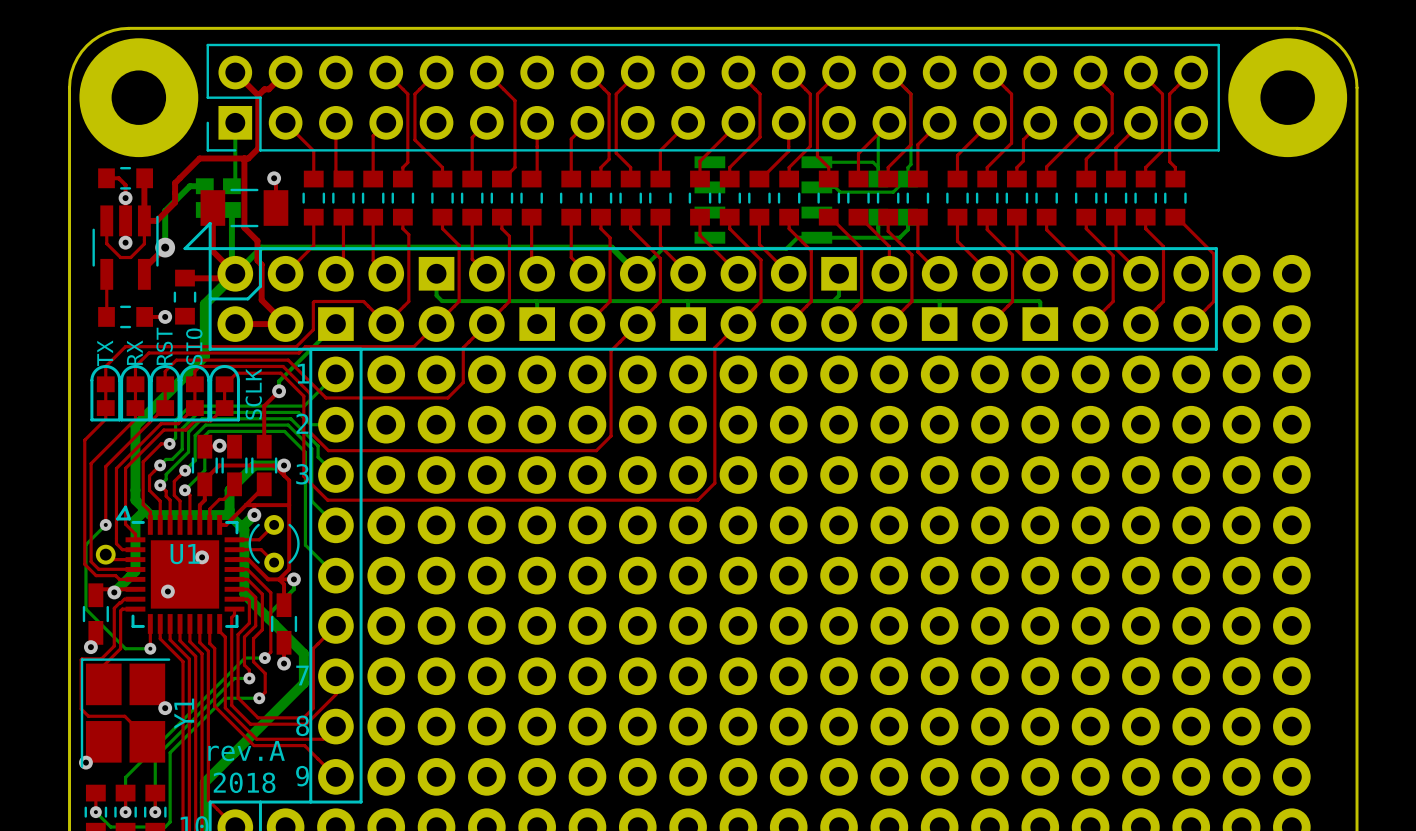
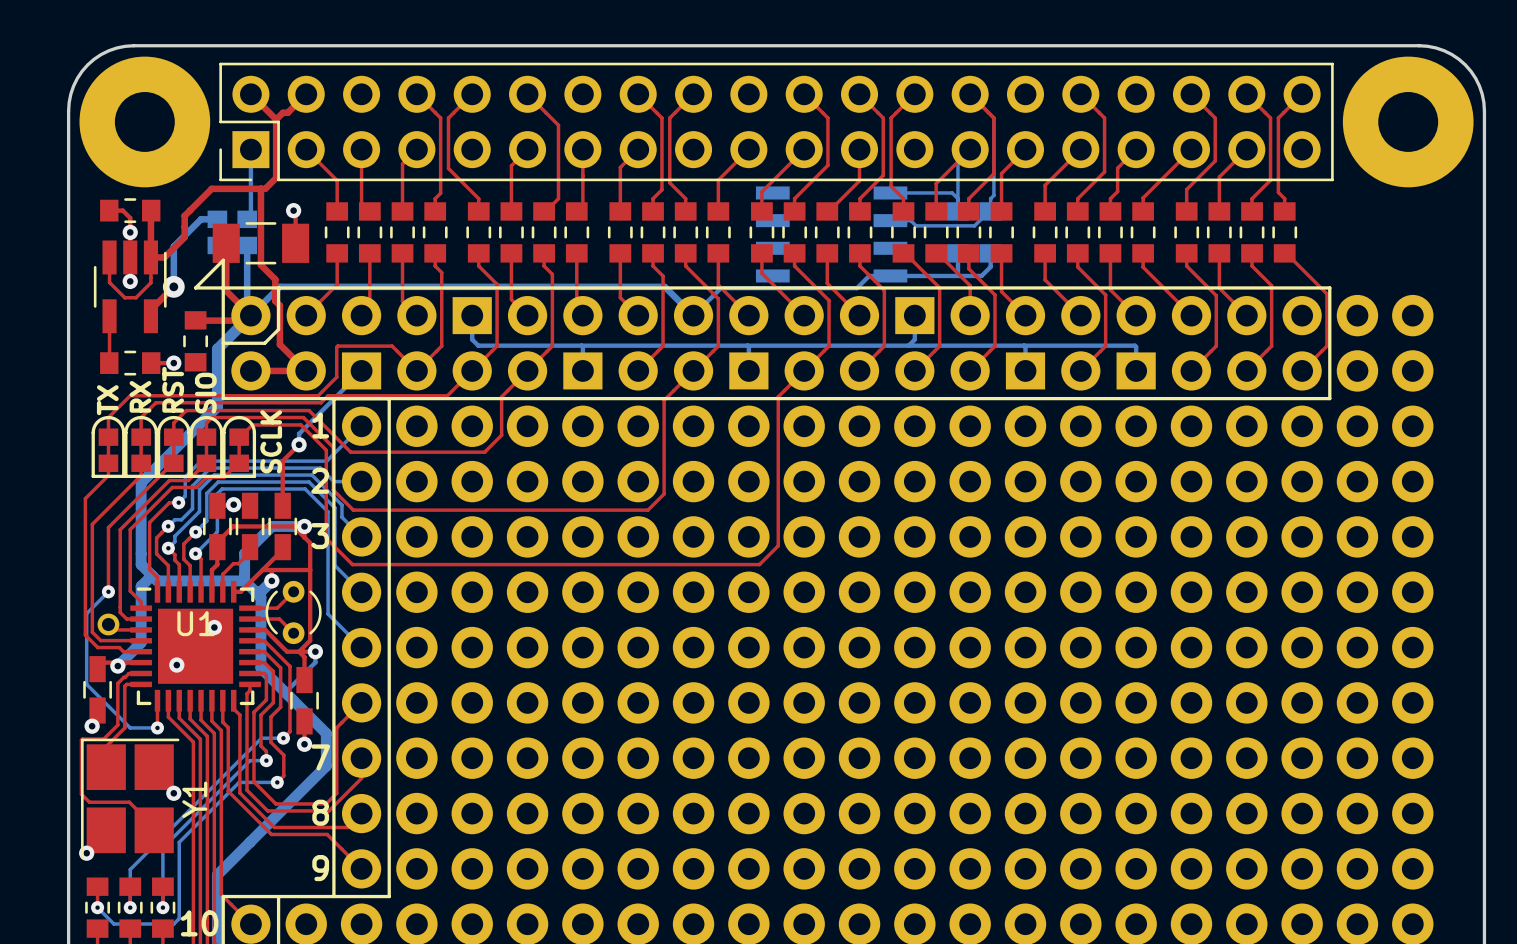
line: (125, 507) (117, 518) (129, 518) (125, 507) -> none
text: rev.A (246, 751) -> none
text: 2018 (244, 782) -> none

